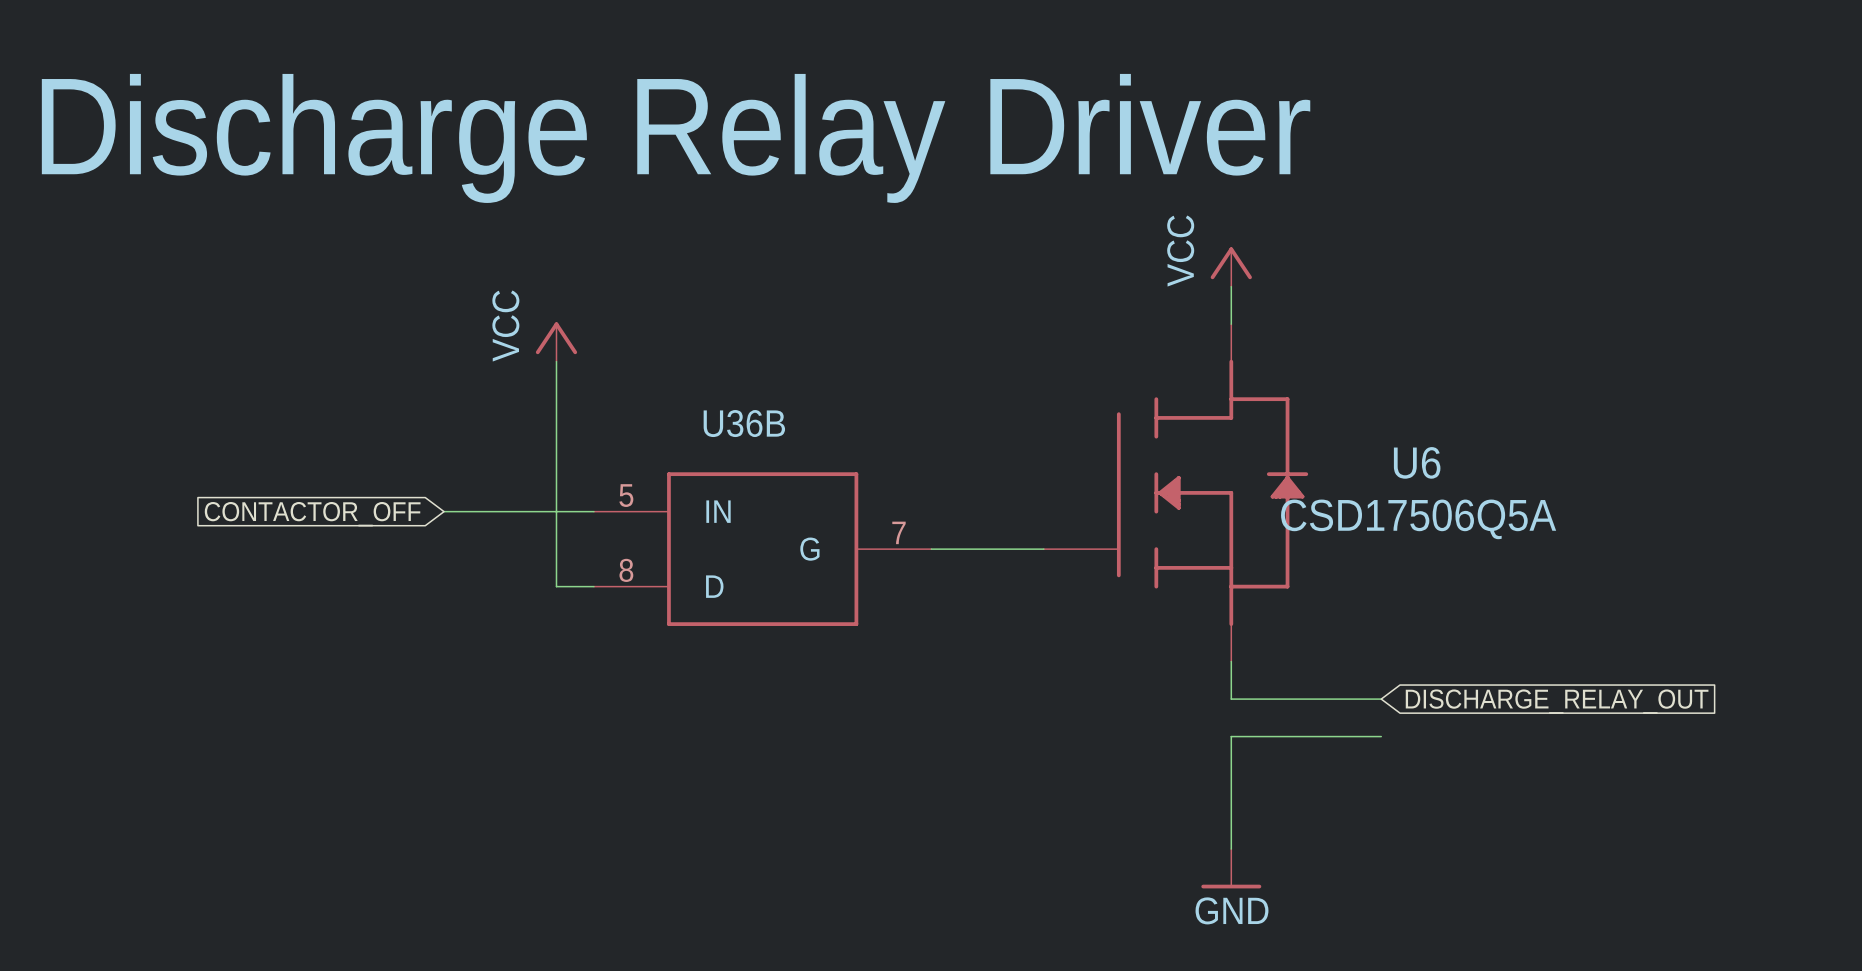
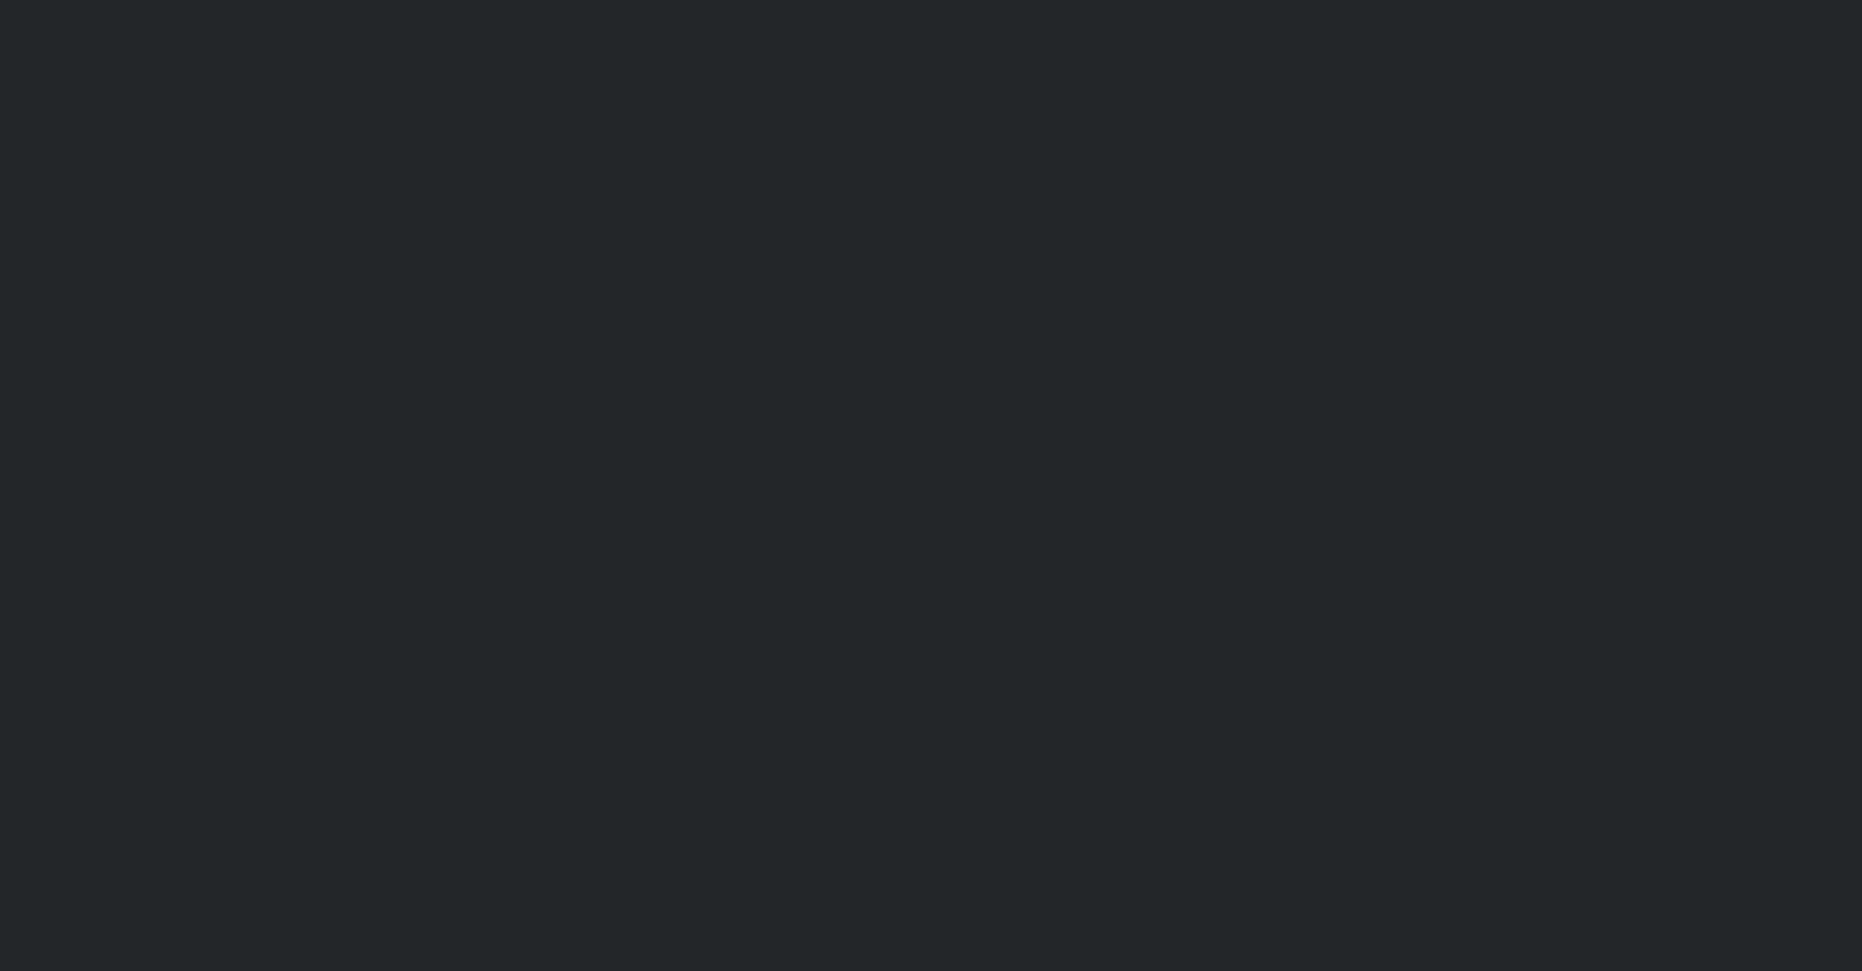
text: Discharge Relay Driver (676, 138) -> none
power symbol: VCC (1231, 267) -> none
wire: (1231, 286) (1231, 324) -> none
power symbol: VCC (556, 342) -> none
wire: (556, 361) (556, 586) (593, 586) -> none
U6: CSD17506Q5A (1176, 492) -> none
wire: (444, 511) (593, 511) -> none
global label: CONTACTOR_OFF (312, 514) -> none
U36B: (762, 549) -> none
wire: (931, 549) (1043, 549) -> none
wire: (1231, 661) (1231, 699) (1381, 699) -> none
global label: DISCHARGE_RELAY_OUT (1557, 701) -> none
wire: (1381, 736) (1231, 736) (1231, 849) -> none
power symbol: GND (1231, 868) -> none

